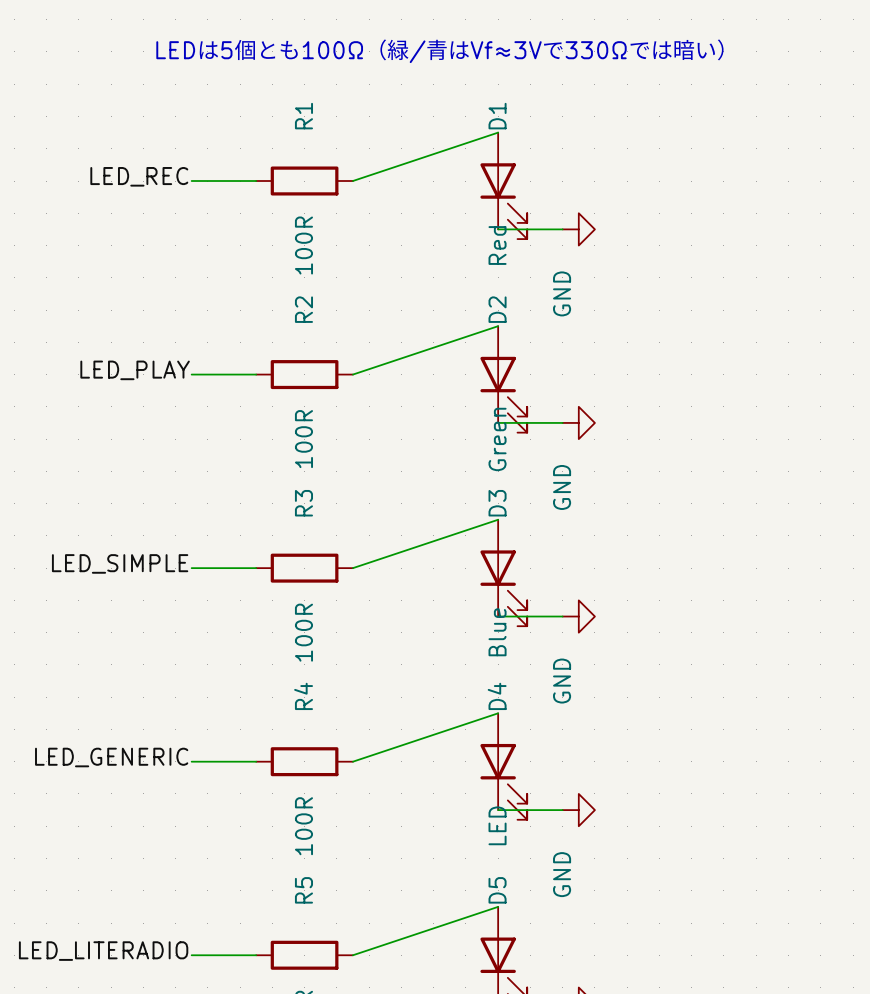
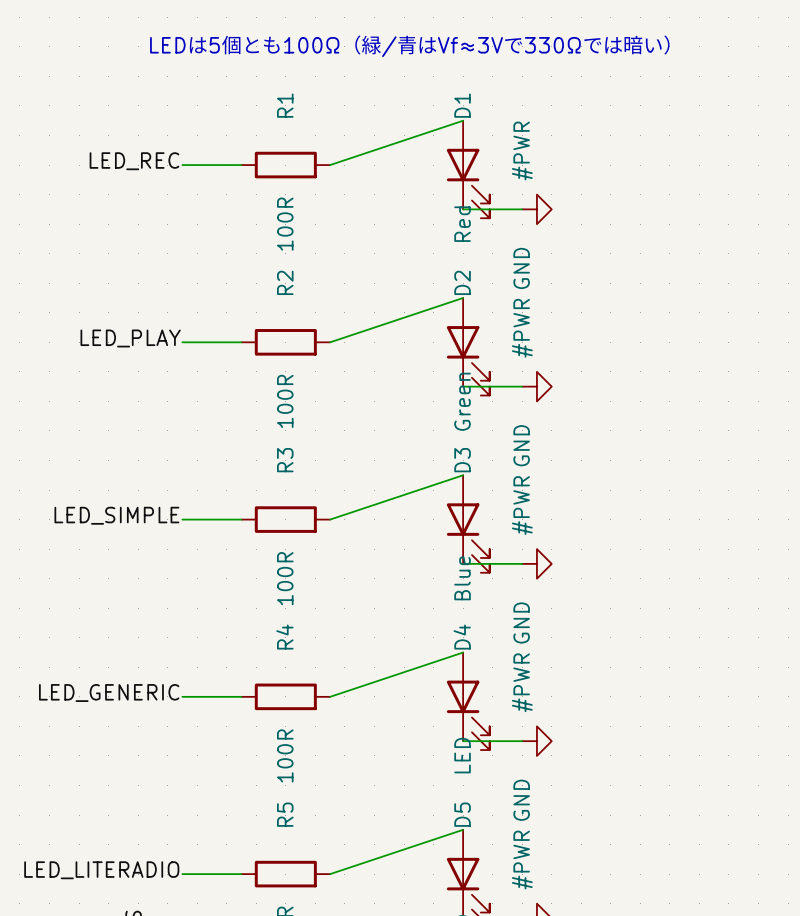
#PWR name: none -> #PWR (522, 150)
#PWR name: none -> #PWR (522, 328)
#PWR name: none -> #PWR (522, 505)
#PWR name: none -> #PWR (522, 682)
#PWR name: none -> #PWR (522, 860)

